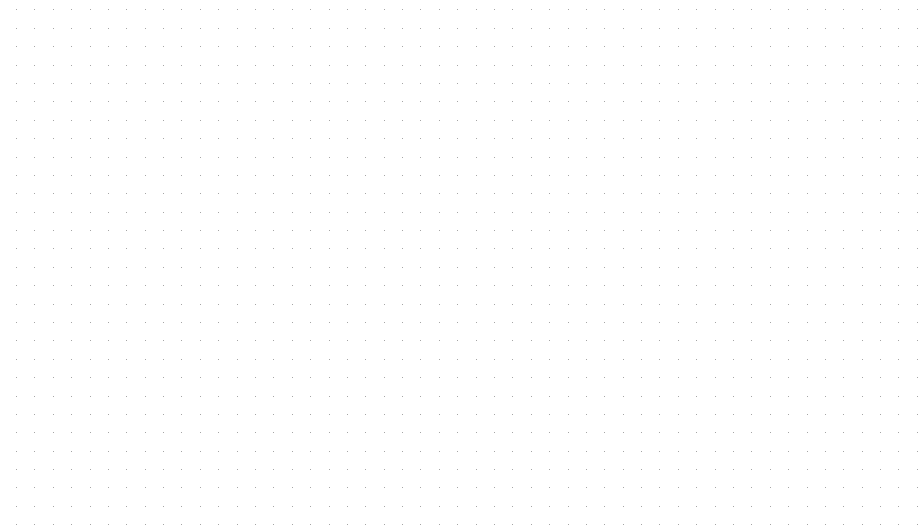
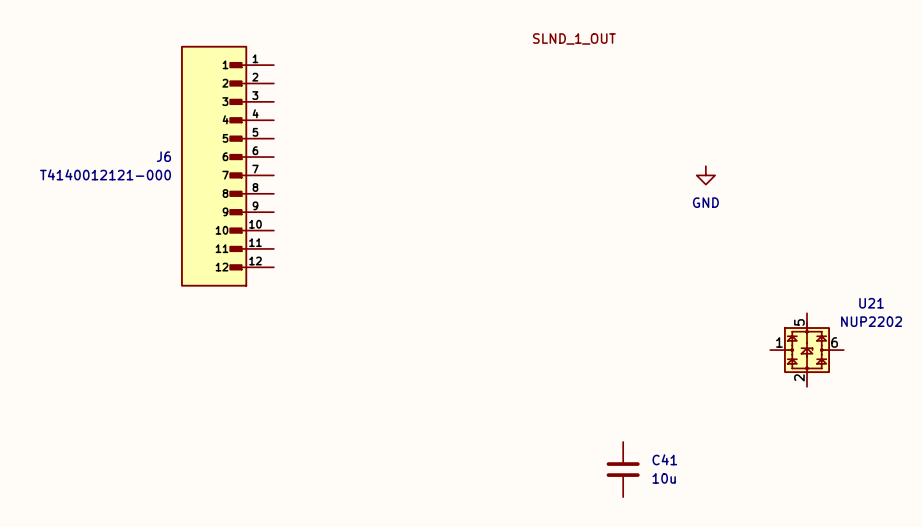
label: none -> SLND_1_OUT (574, 38)
J6: none -> T4140012121-000 (227, 166)
power symbol: none -> GND (705, 175)
U21: none -> NUP2202 (807, 350)
C41: none -> 10u (623, 469)

